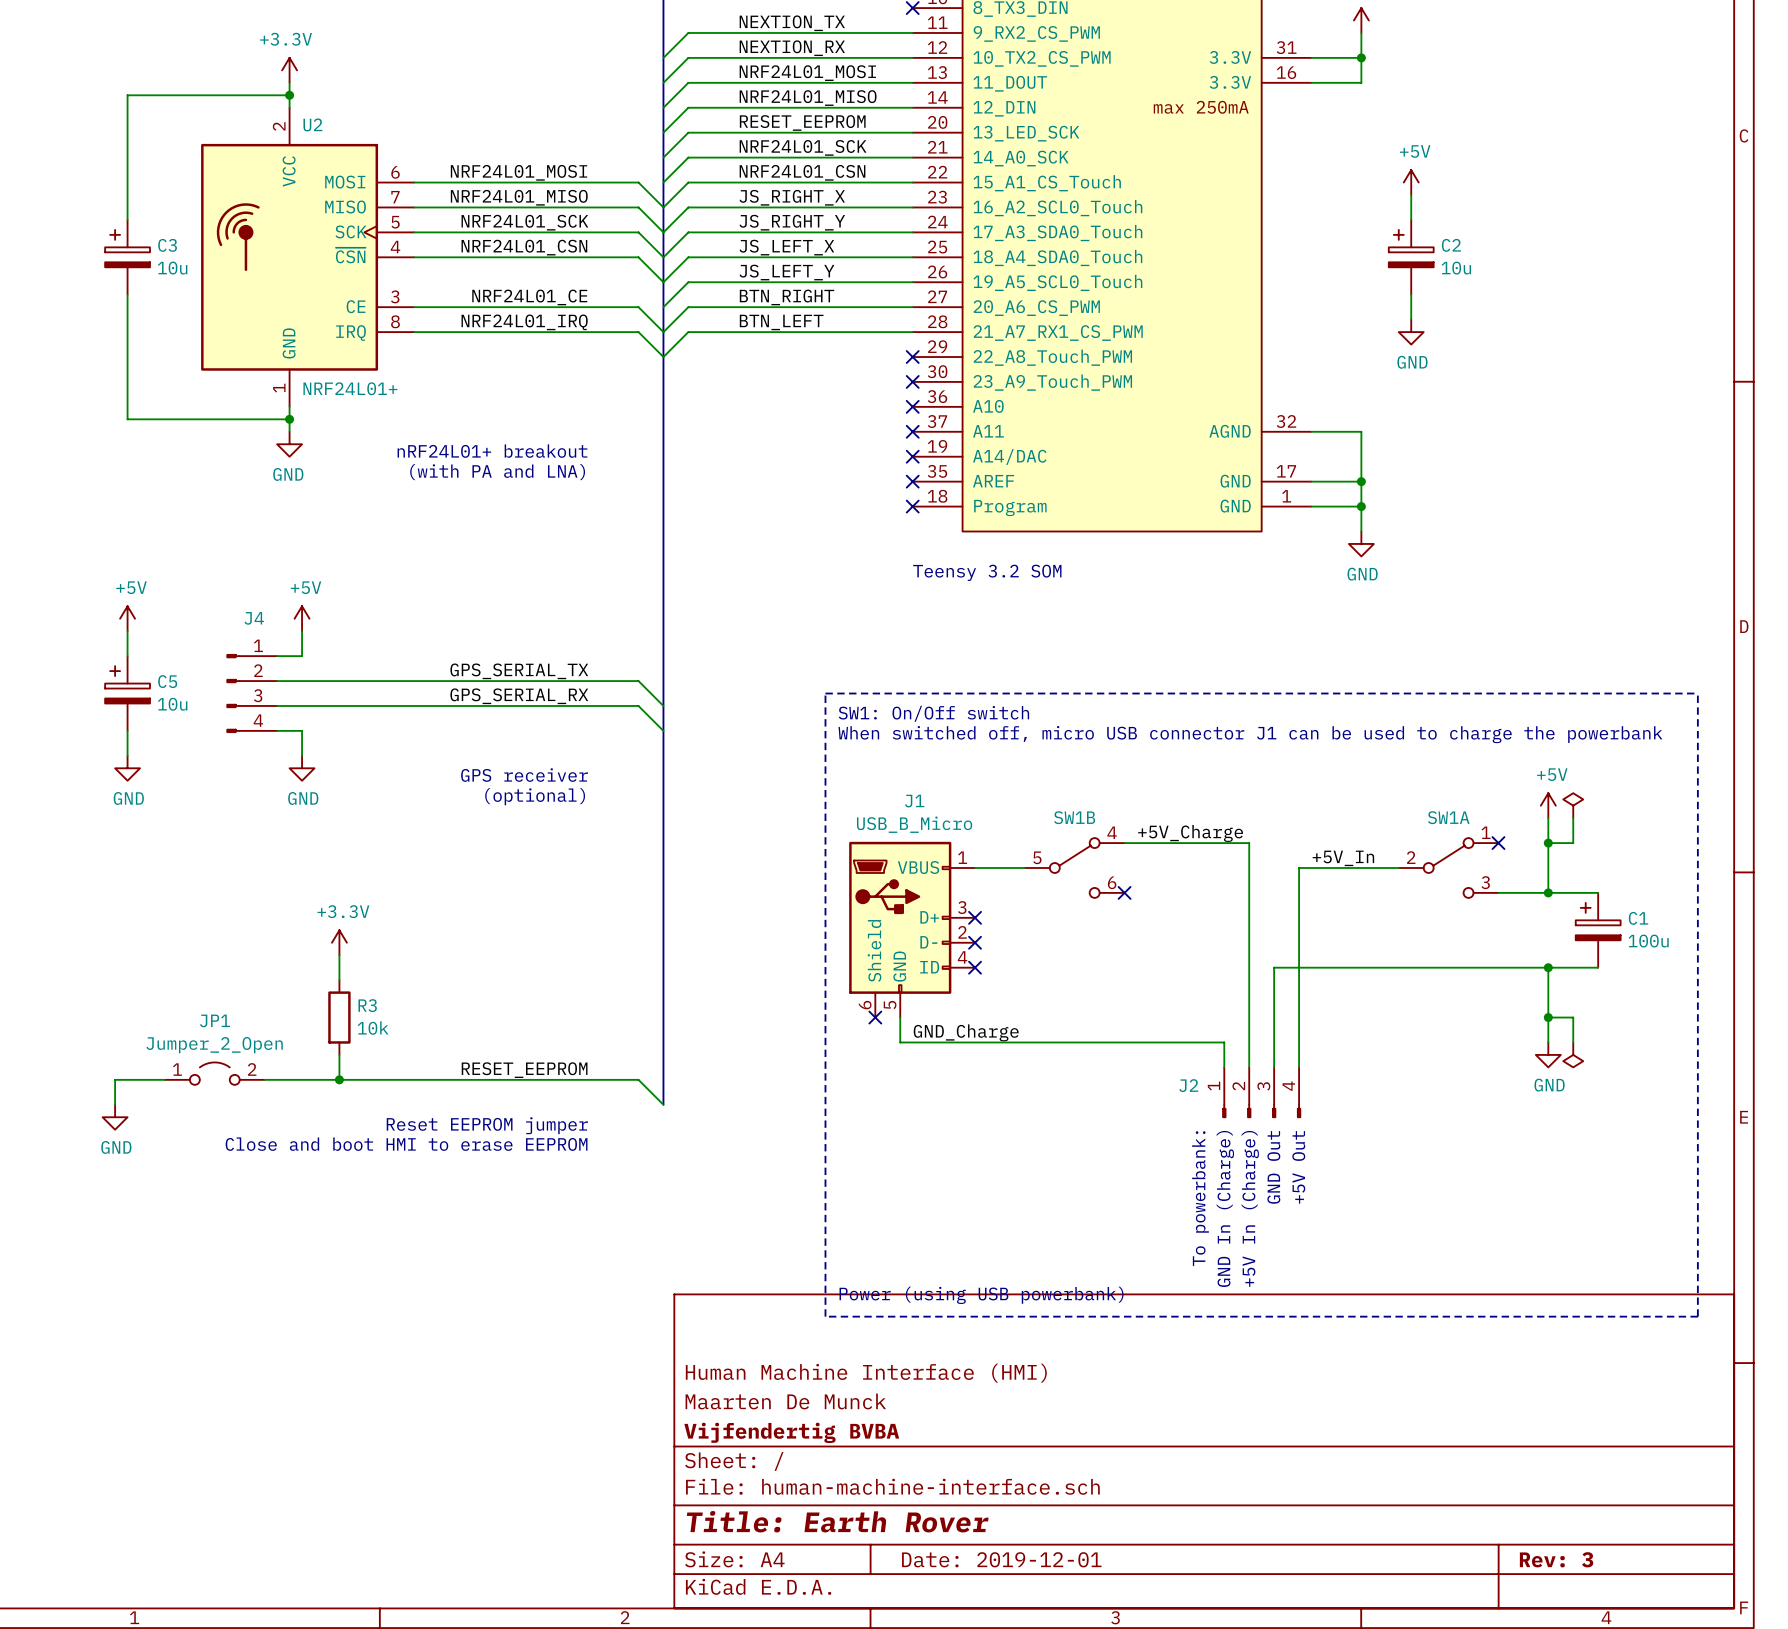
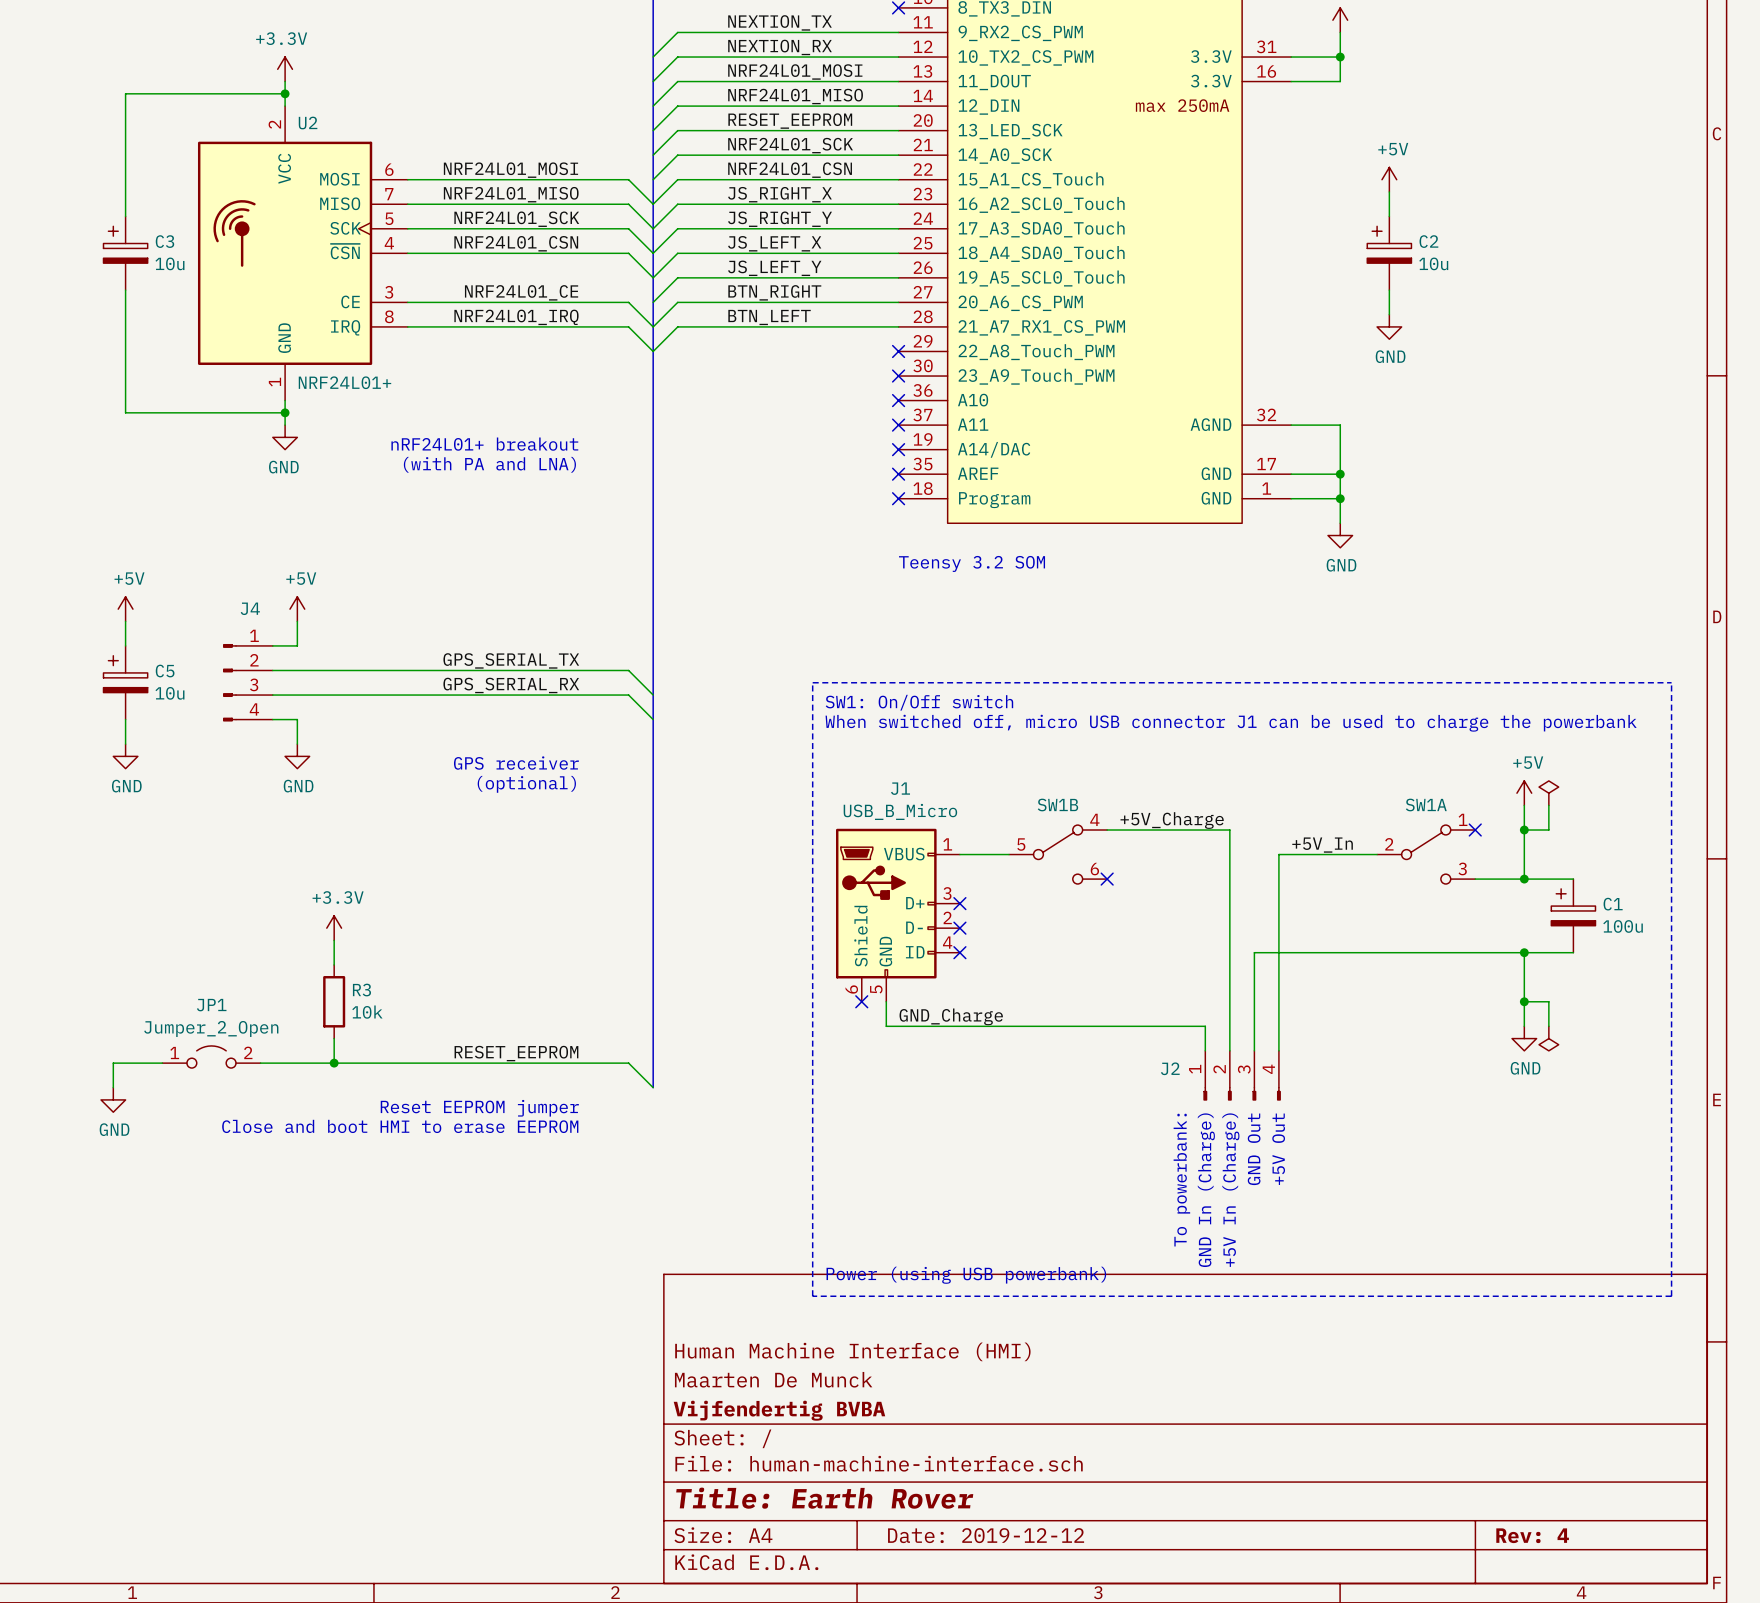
title block: Date: 2019-12-01 (1001, 1559) -> Date: 2019-12-12 (986, 1535)
title block: Rev: 3 (1556, 1559) -> Rev: 4 (1532, 1535)

